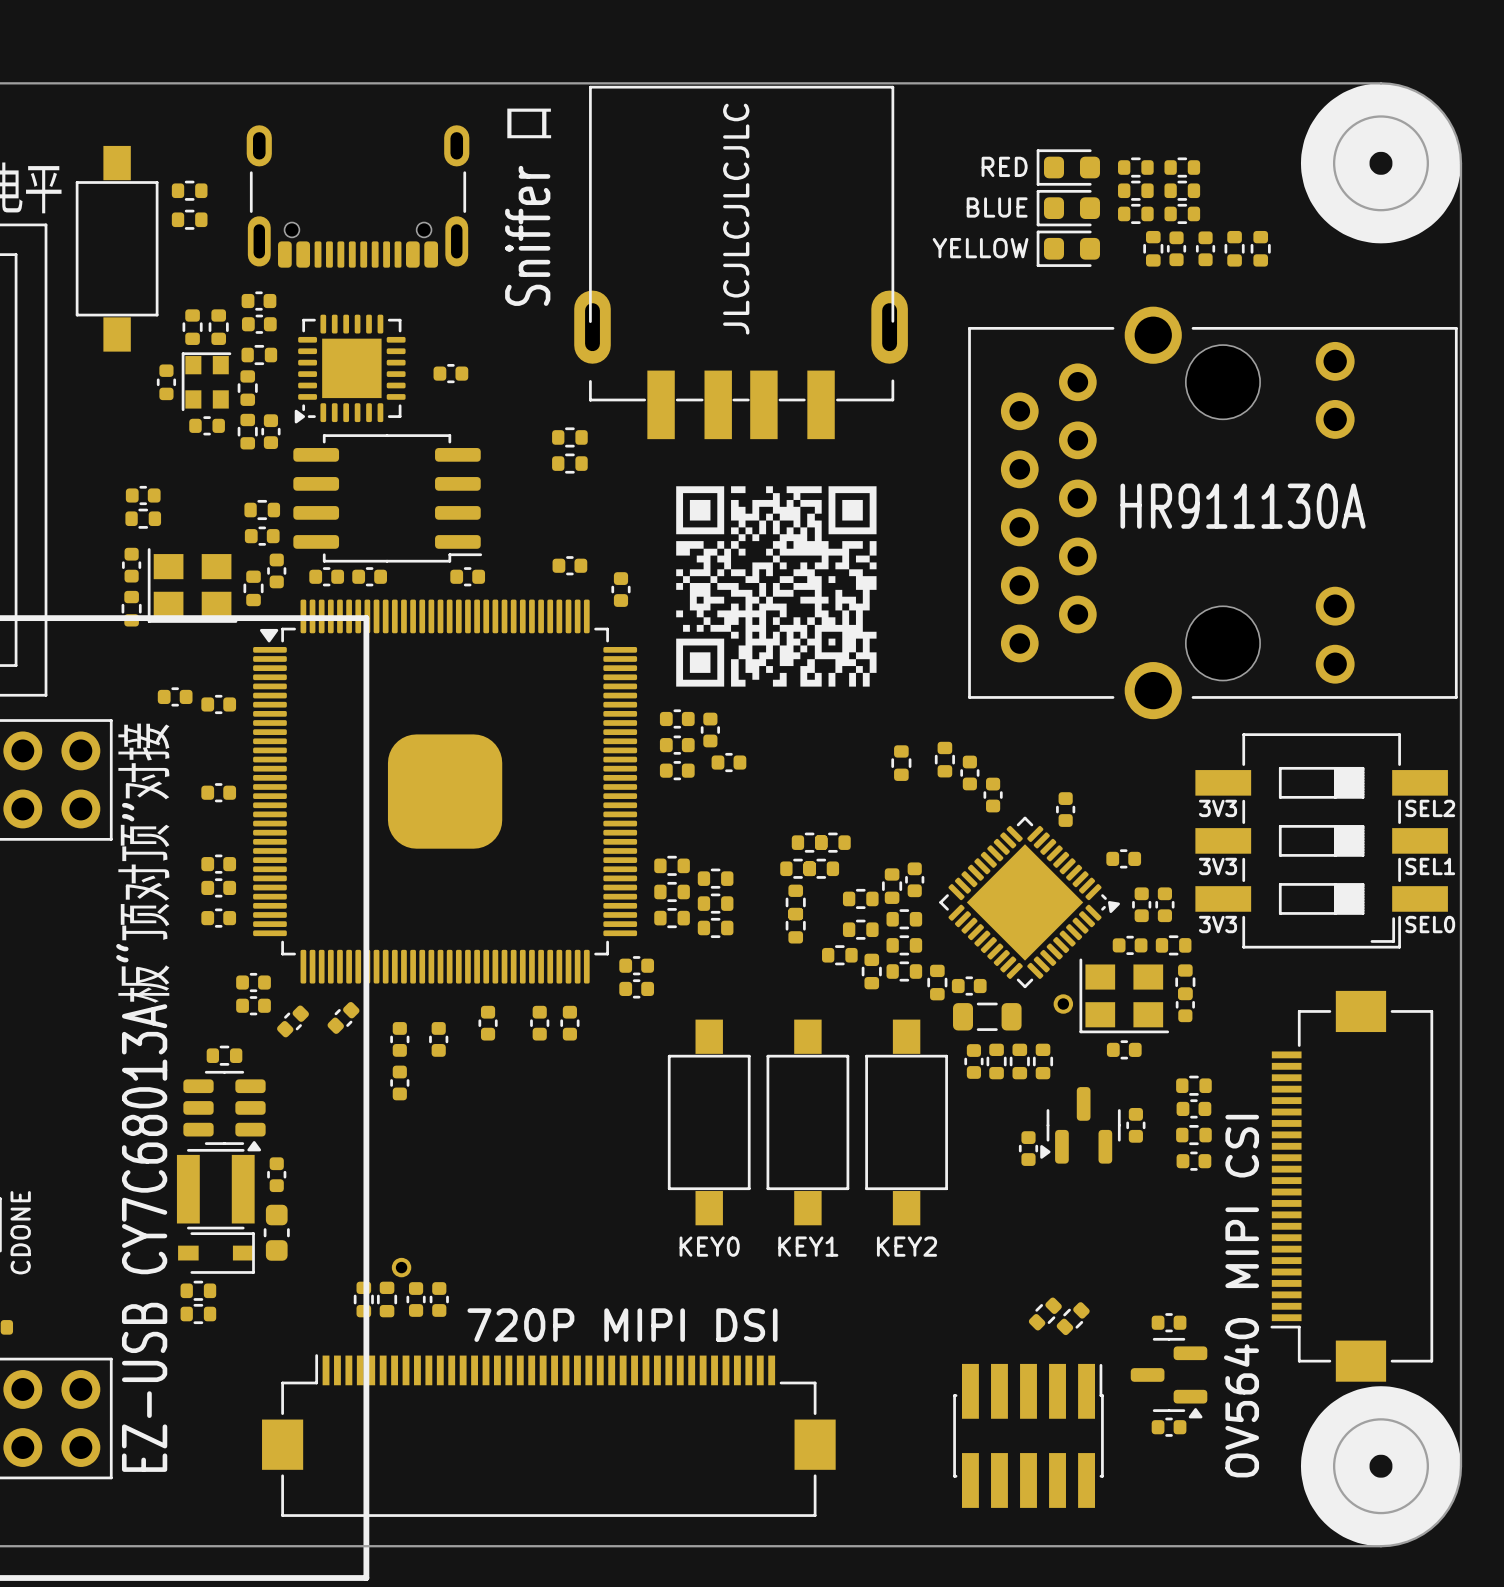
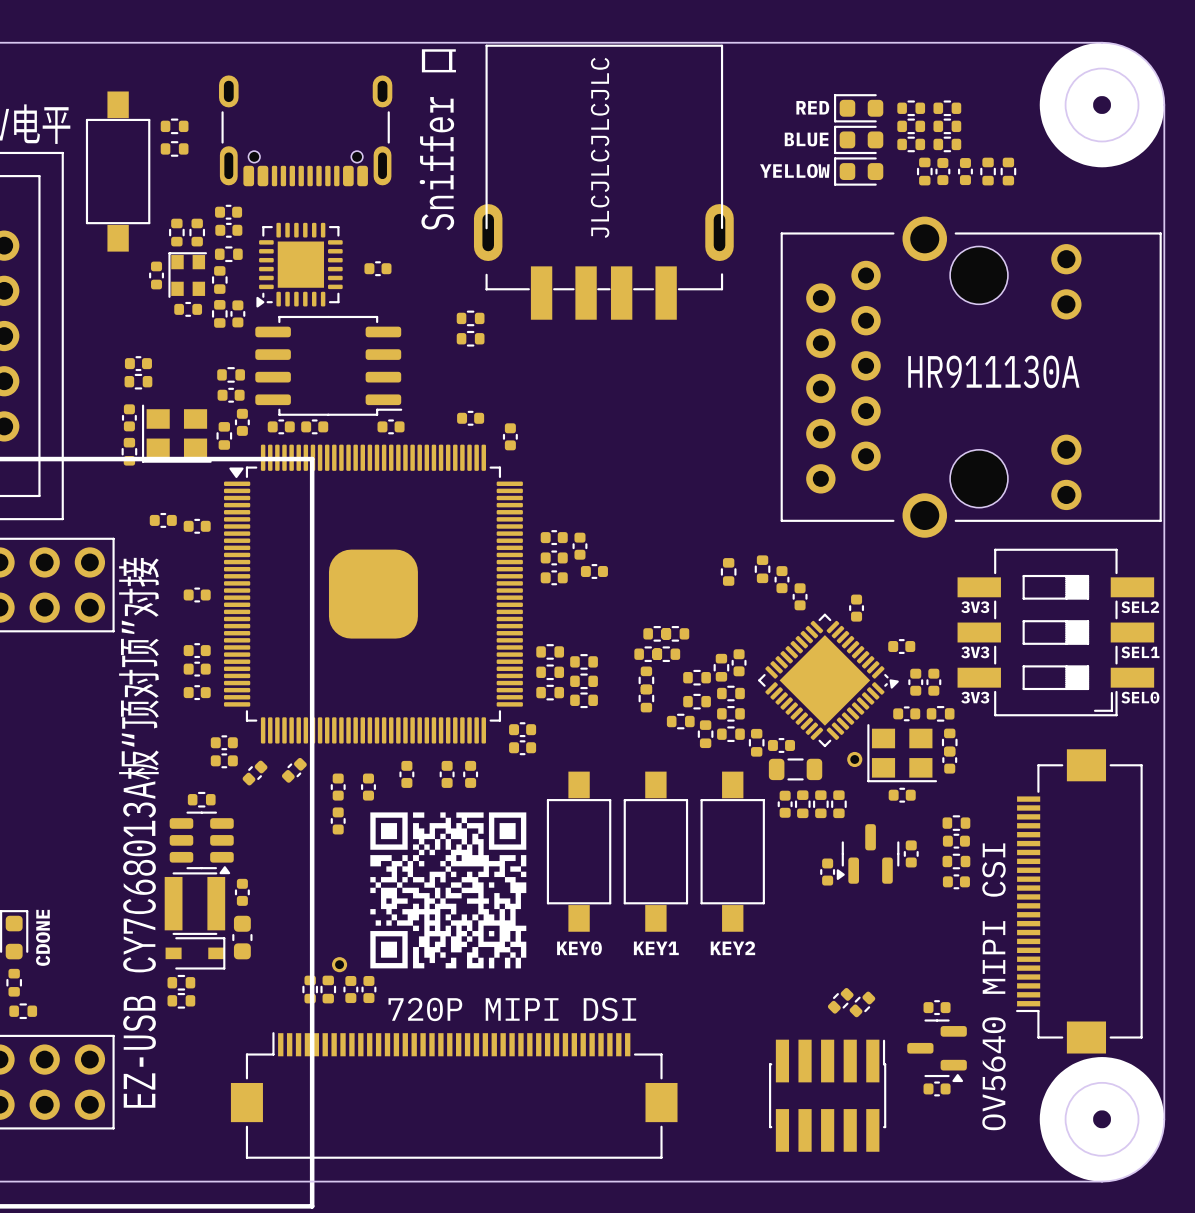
drawing: [676, 486, 877, 687] -> none
drawing: none -> [370, 812, 527, 969]

